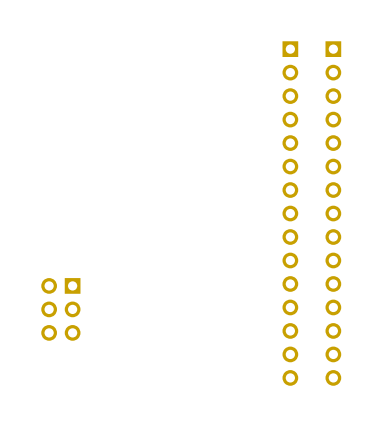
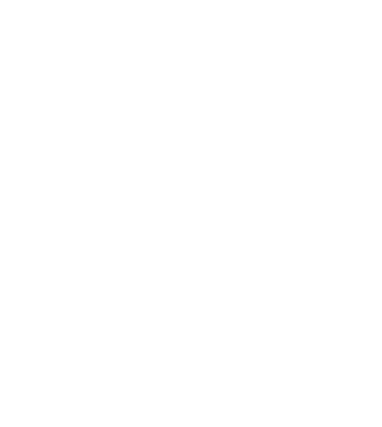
part: (290, 213) -> none
part: (333, 213) -> none
part: (60, 309) -> none

